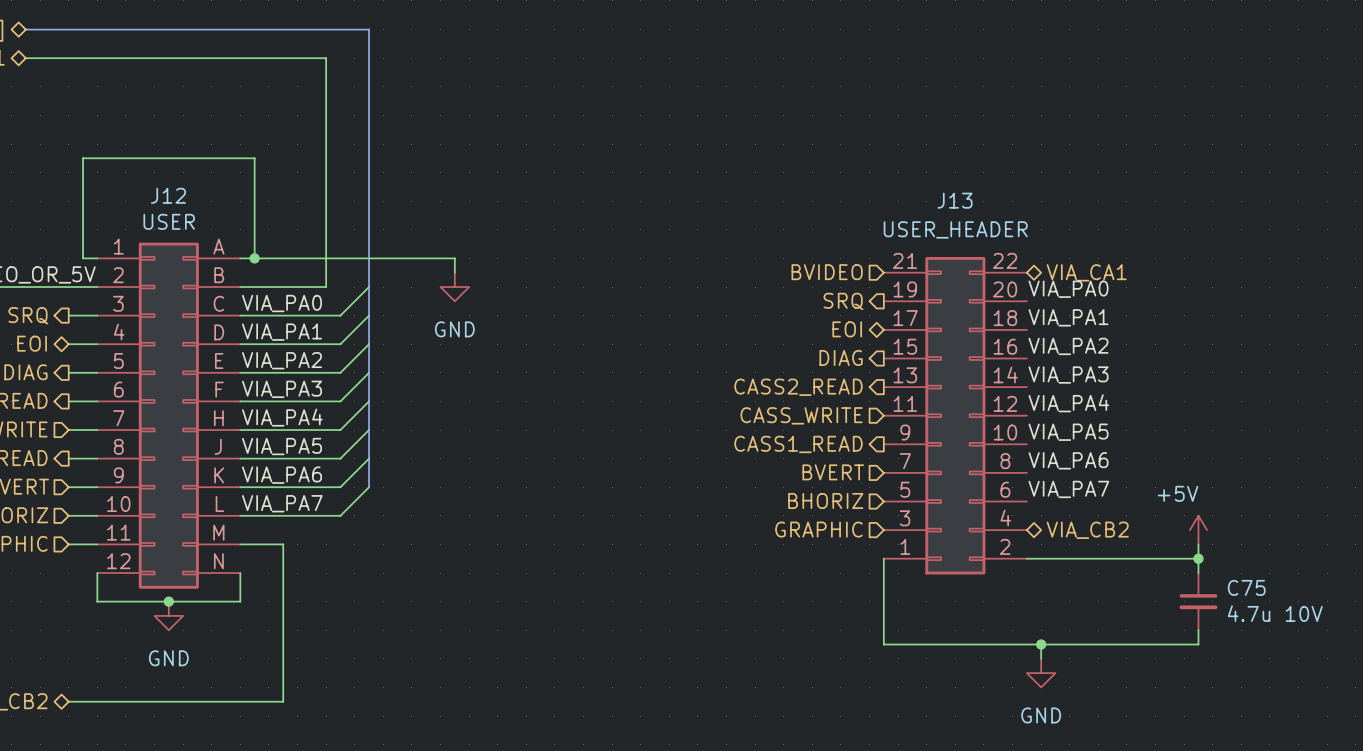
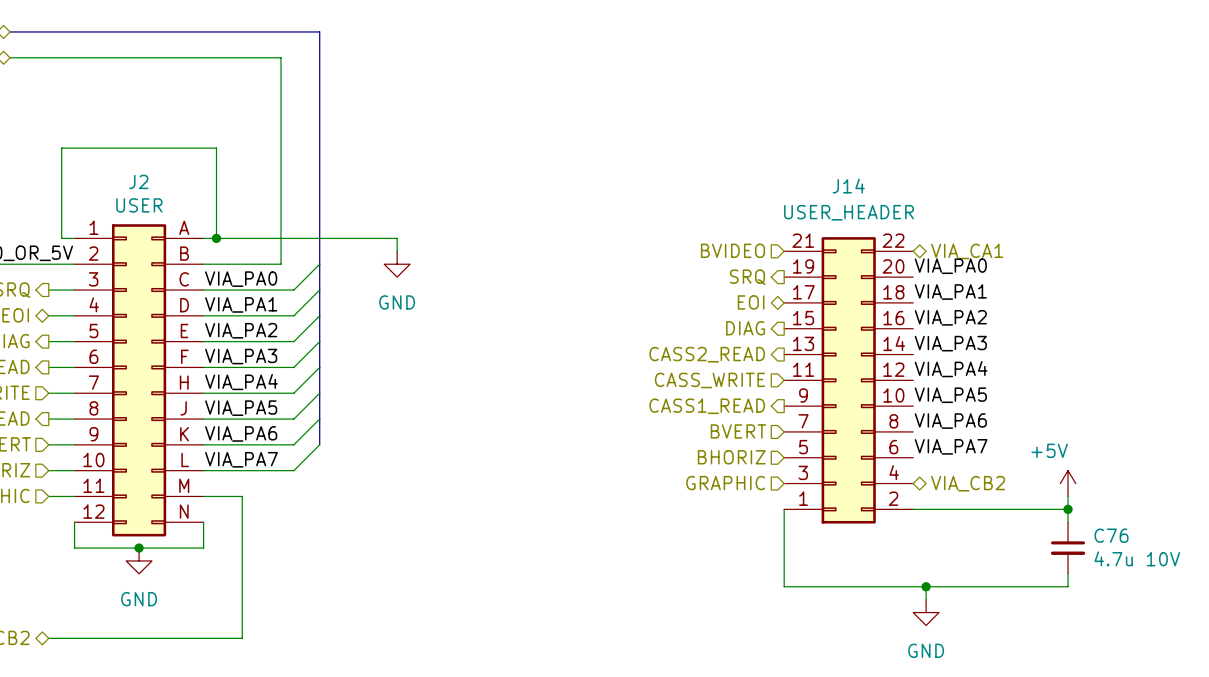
J12 name: J12 (168, 195) -> J2 (138, 181)
J13 name: J13 (955, 200) -> J14 (848, 186)
C75 name: C75 (1246, 587) -> C76 (1111, 535)

